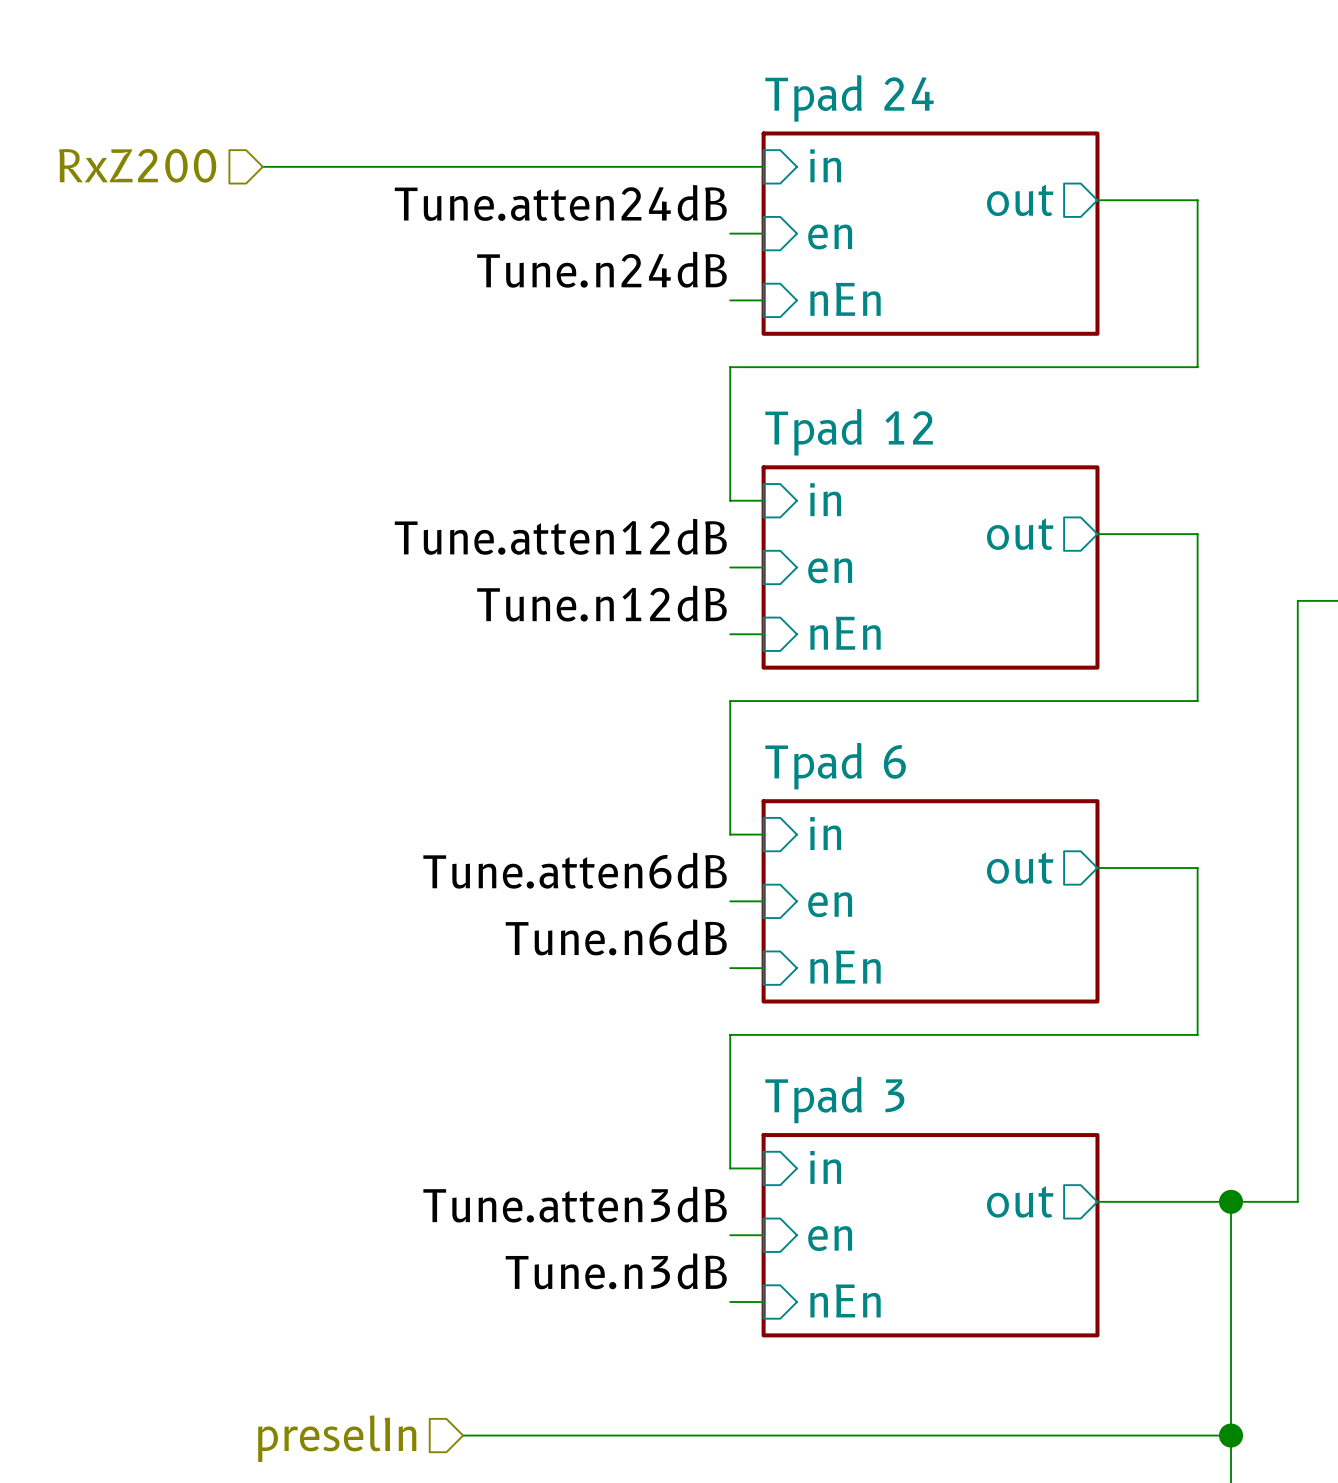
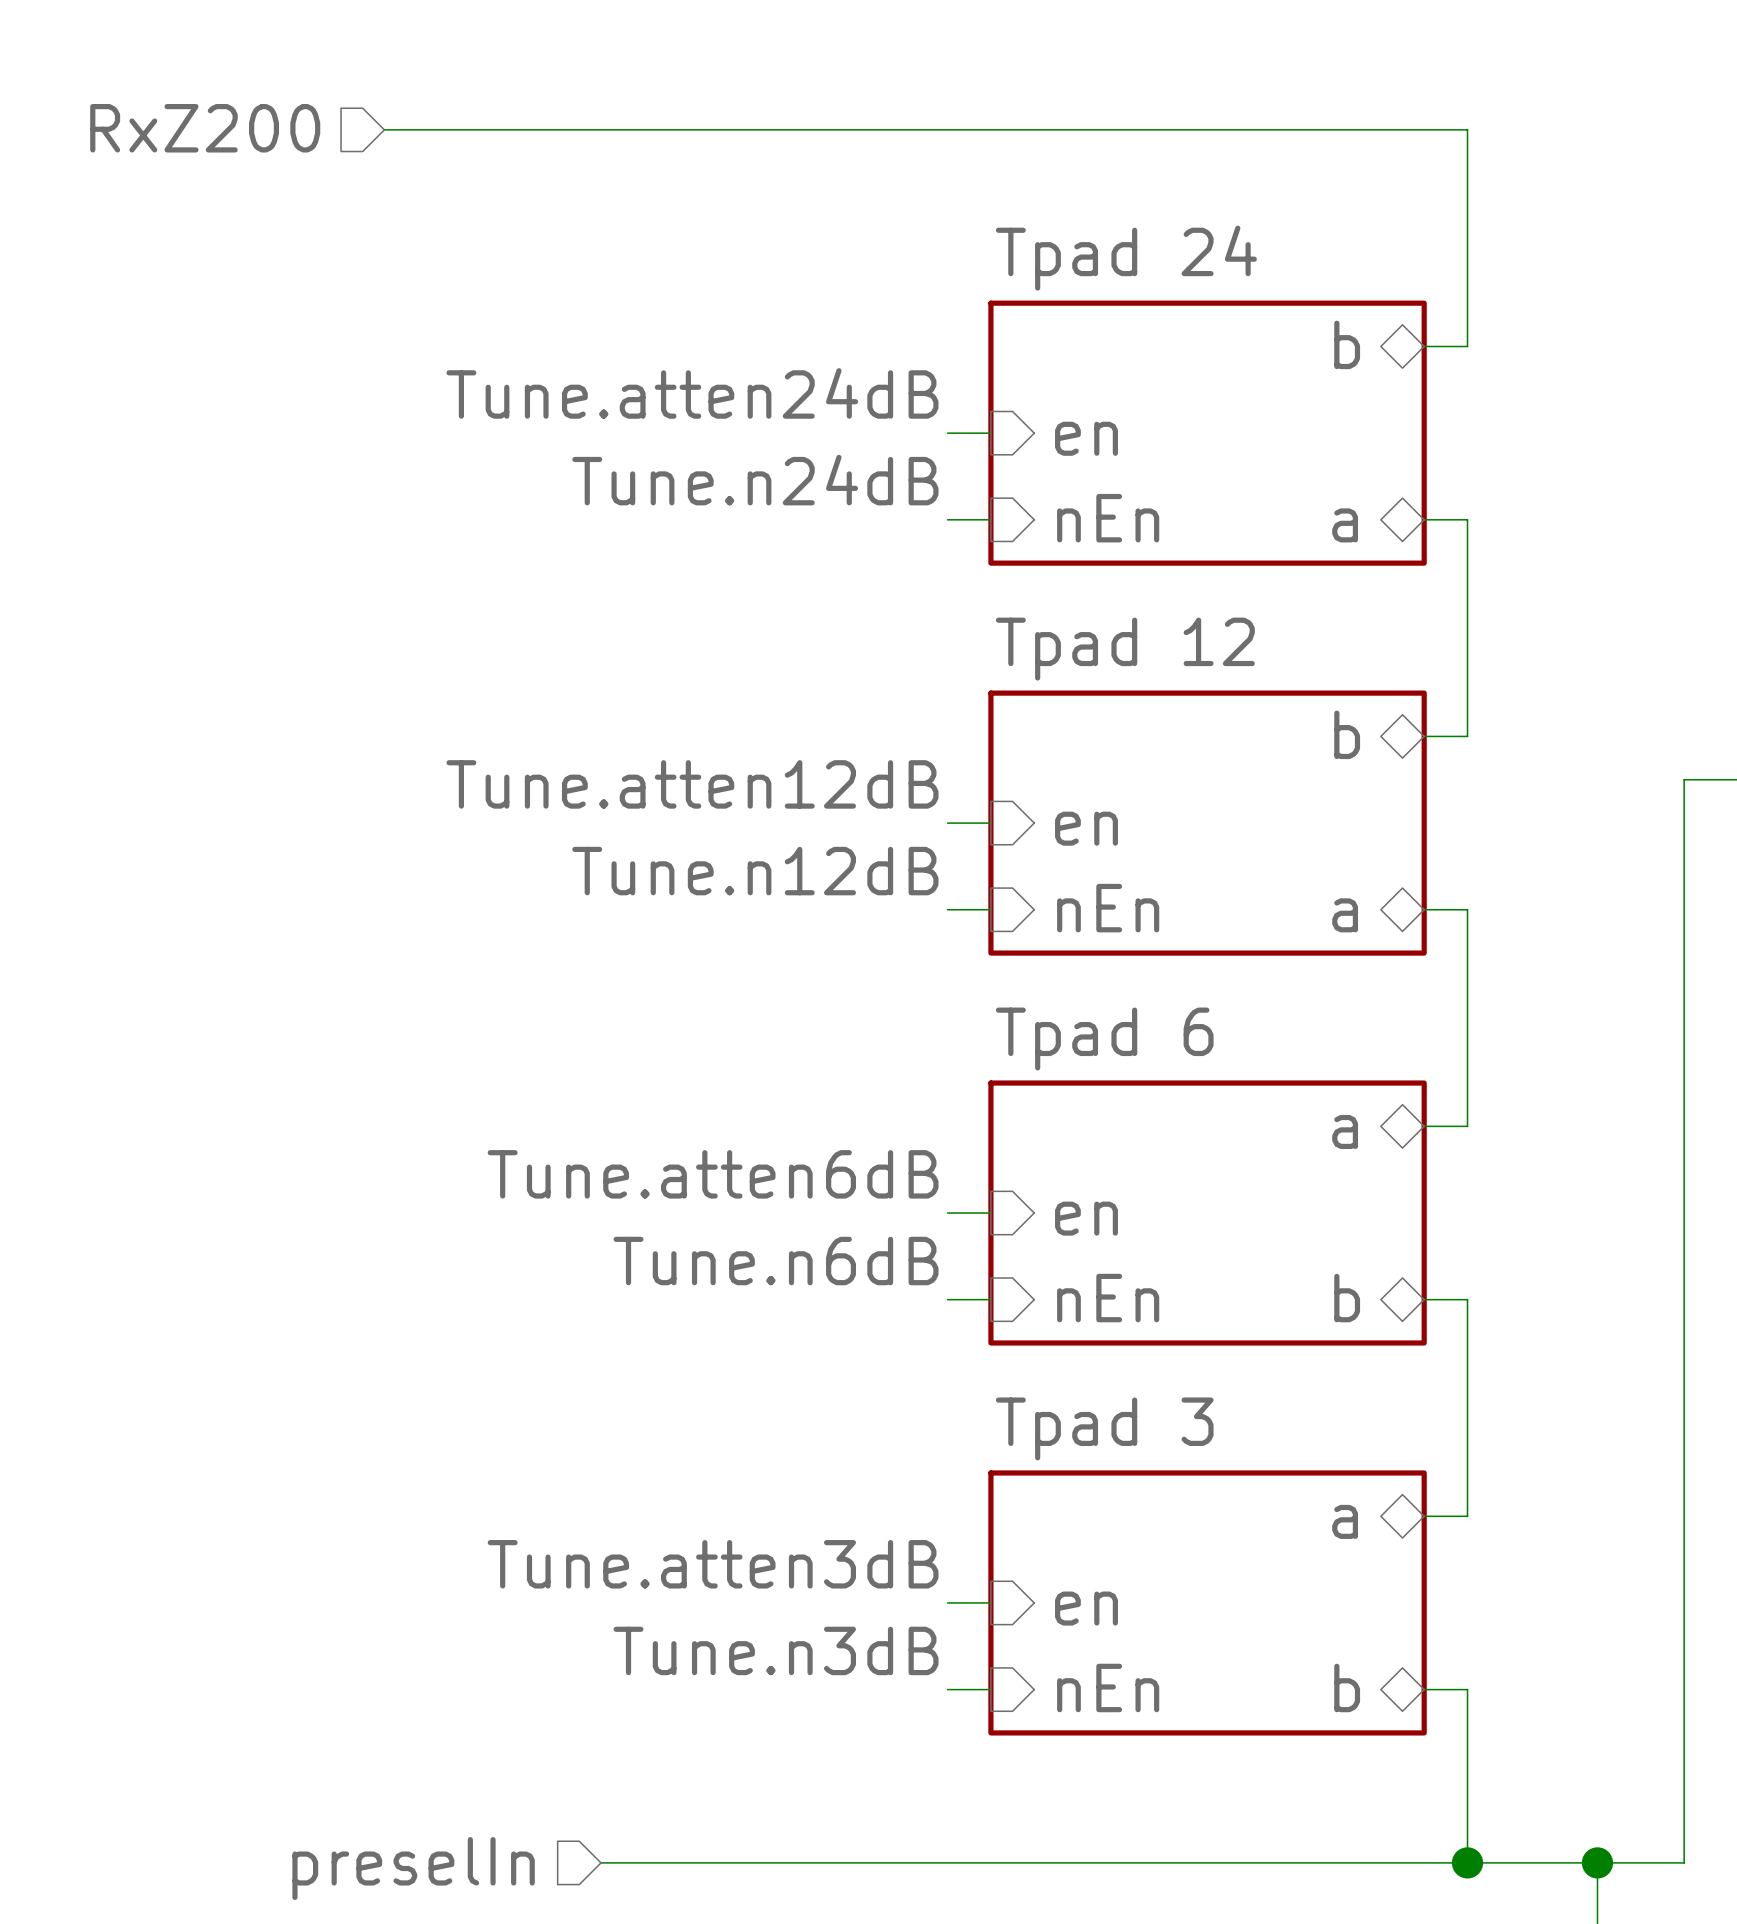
wire: none -> (384, 129) (1467, 129) (1467, 346) (1424, 346)
hierarchical label position: RxZ200 (137, 165) -> RxZ200 (205, 128)
sheet pin: in (825, 165) -> none
wire: (262, 166) (763, 166) -> none
sheet pin: out (1020, 200) -> none
wire: (1097, 200) (1197, 200) (1197, 367) (730, 367) (730, 500) (763, 500) -> none
label position: Tune.atten24dB (560, 202) -> Tune.atten24dB (692, 393)
wire: (730, 233) (763, 233) -> (947, 519) (990, 519)
sheet Tpad 24 position: (930, 233) -> (1207, 433)
sheet pin position: en (830, 236) -> en (1086, 438)
sheet pin: none -> b (1347, 344)
label position: Tune.n24dB (601, 269) -> Tune.n24dB (755, 480)
sheet pin position: nEn (845, 299) -> nEn (1108, 518)
wire: (730, 300) (763, 300) -> (947, 433) (990, 433)
wire: none -> (1424, 519) (1467, 519) (1467, 736) (1424, 736)
sheet pin: none -> a (1345, 525)
sheet pin: in (825, 499) -> none
sheet pin: out (1020, 534) -> none
wire: (1097, 534) (1197, 534) (1197, 701) (1130, 701) -> (1467, 1126) (1467, 909)
label: Tune.atten12dB (560, 536) -> none
sheet pin: none -> b (1347, 734)
wire: (730, 567) (763, 567) -> none
sheet Tpad 12 position: (930, 567) -> (1207, 823)
sheet pin: en (830, 570) -> none
label: Tune.n12dB (601, 603) -> Tune.atten12dB (692, 784)
sheet pin: nEn (845, 633) -> en (1086, 828)
label: none -> Tune.n12dB (755, 871)
sheet pin: none -> nEn (1108, 908)
wire: (730, 701) (730, 834) (763, 834) -> none
wire: (763, 701) (1097, 701) -> none
sheet pin: none -> a (1345, 915)
sheet pin: in (825, 833) -> none
wire: (1130, 867) (1197, 867) (1197, 1034) (730, 1034) (730, 1168) (763, 1168) -> none
sheet pin shape: output (1020, 868) -> bidirectional (1345, 1131)
sheet pin: out (1020, 868) -> a (1345, 1131)
label position: Tune.atten6dB (575, 870) -> Tune.atten6dB (713, 1174)
wire: (730, 901) (763, 901) -> (947, 1213) (990, 1213)
sheet Tpad 6 position: (930, 901) -> (1207, 1213)
sheet pin position: en (830, 904) -> en (1086, 1218)
label position: Tune.n6dB (616, 937) -> Tune.n6dB (776, 1261)
sheet pin position: nEn (845, 967) -> nEn (1108, 1298)
wire: (730, 968) (763, 968) -> (947, 1299) (990, 1299)
sheet pin: none -> b (1347, 1298)
wire: none -> (1424, 1299) (1467, 1299) (1467, 1516) (1424, 1516)
sheet pin: in (825, 1167) -> none
sheet pin: none -> a (1345, 1521)
sheet pin: out (1020, 1201) -> none
wire: (1097, 1201) (1297, 1201) -> none
wire: (1231, 1201) (1231, 1435) -> (1684, 1559) (1684, 1862) (1597, 1862)
junction: (1231, 1201) -> none
sheet pin: none -> b (1347, 1687)
wire: none -> (1424, 1689) (1467, 1689) (1467, 1862)
junction: none -> (1467, 1862)

